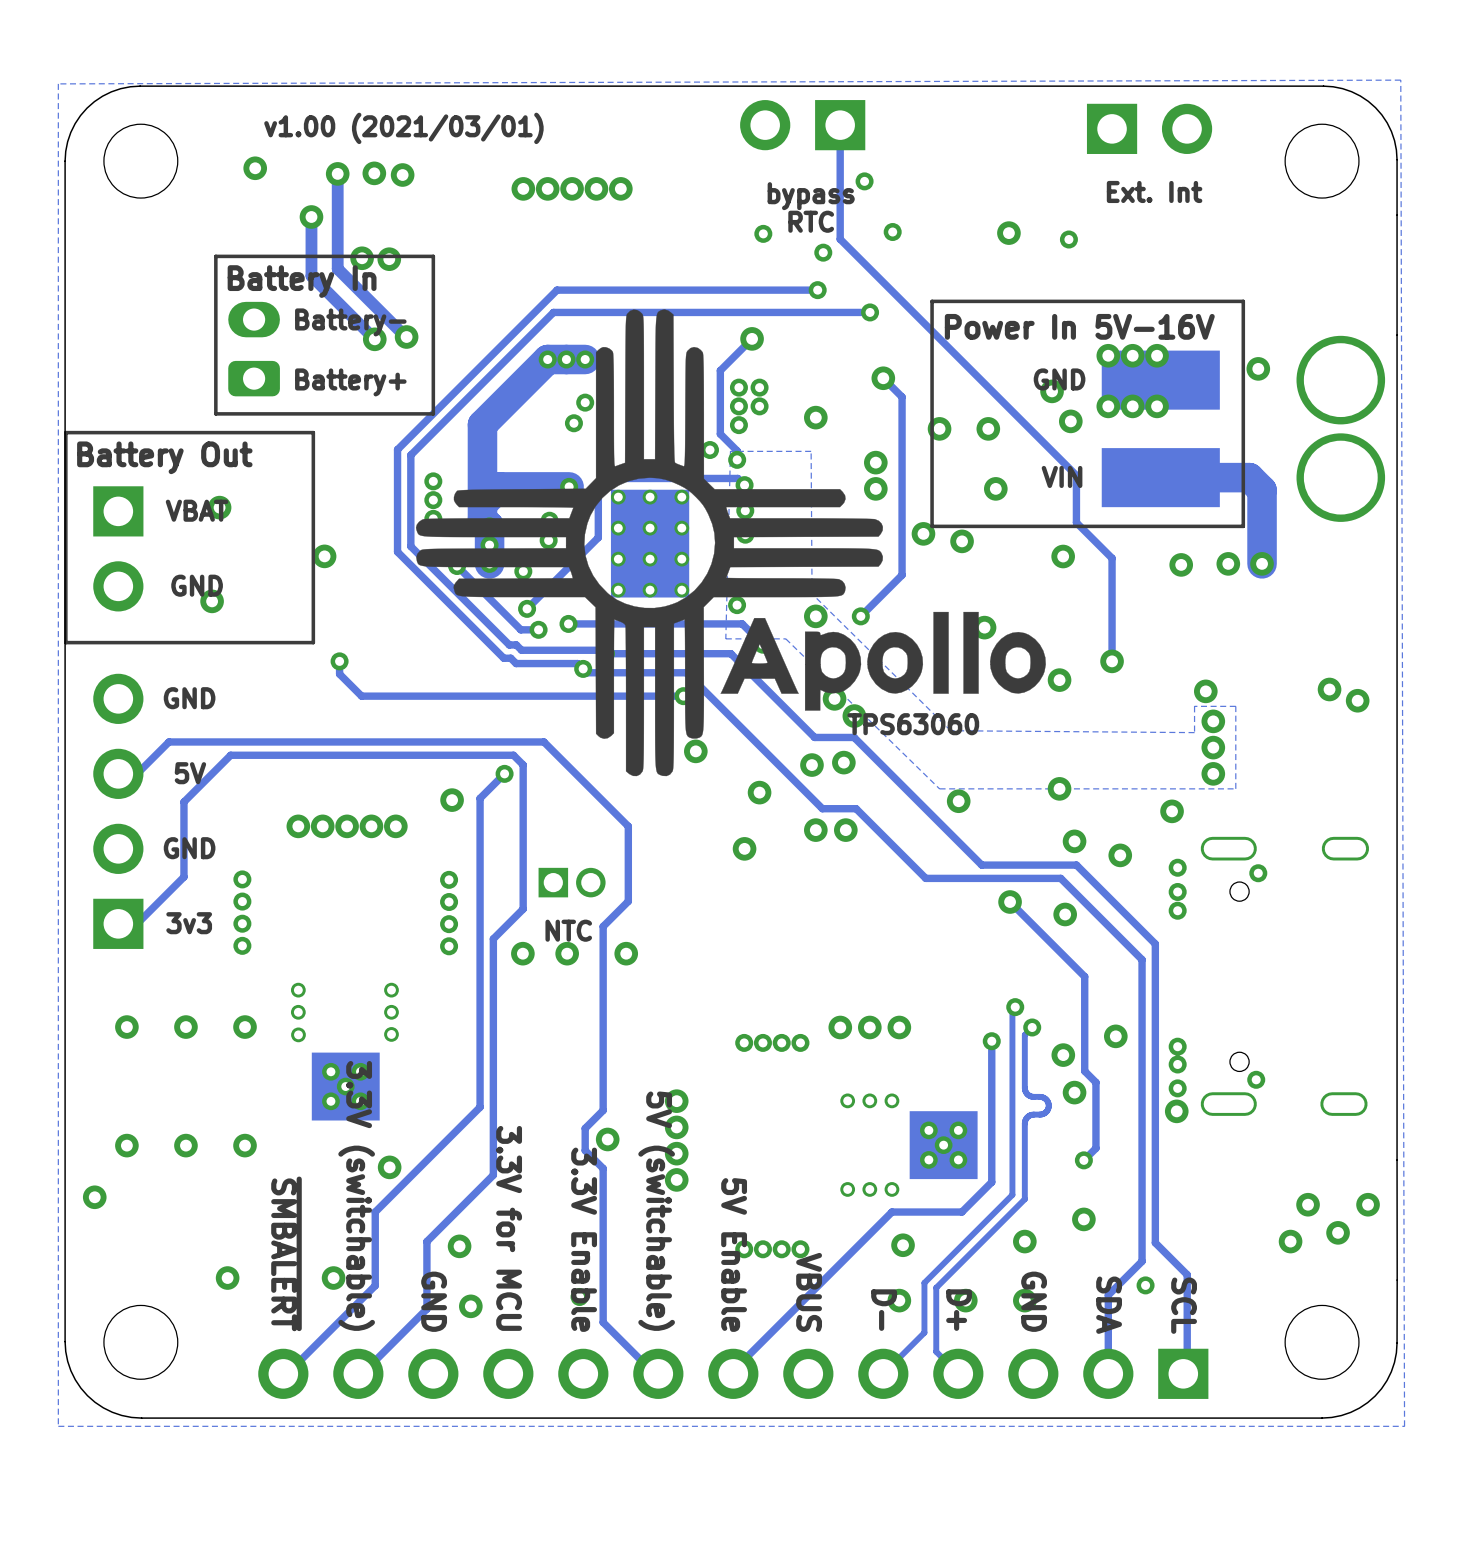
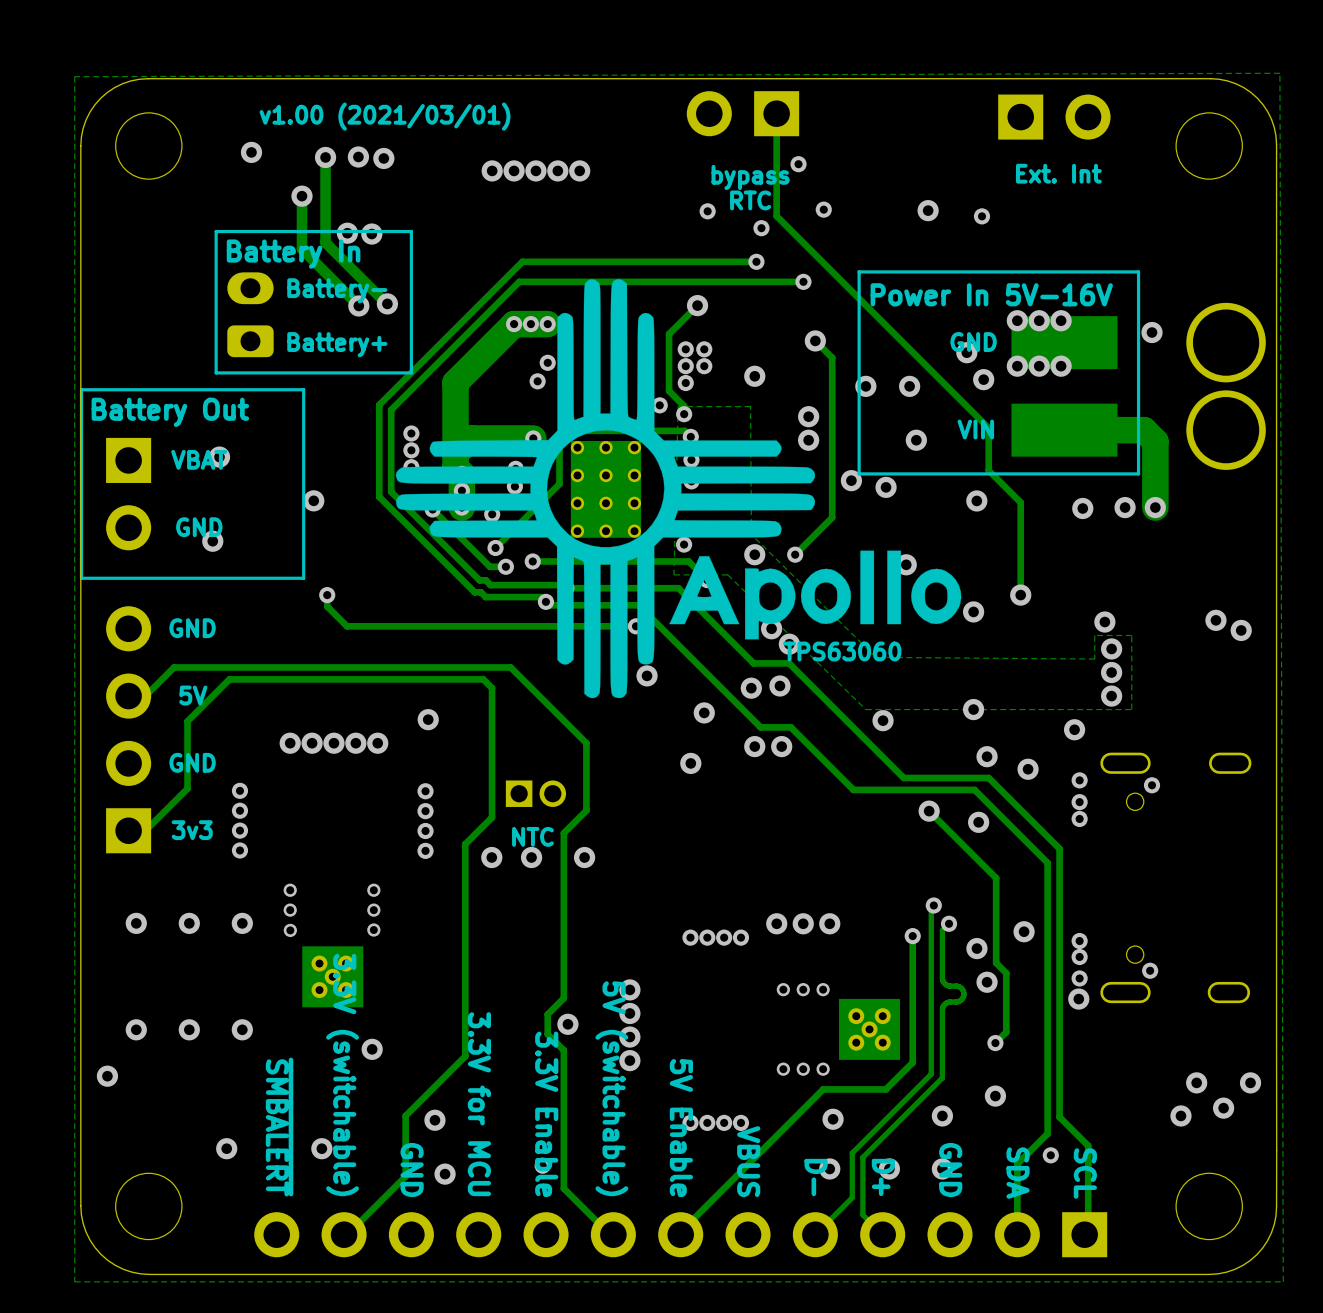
track: (504, 773) (480, 798) (480, 1107) (375, 1212) (375, 1285) (283, 1377) -> none
via: (504, 773) -> none

